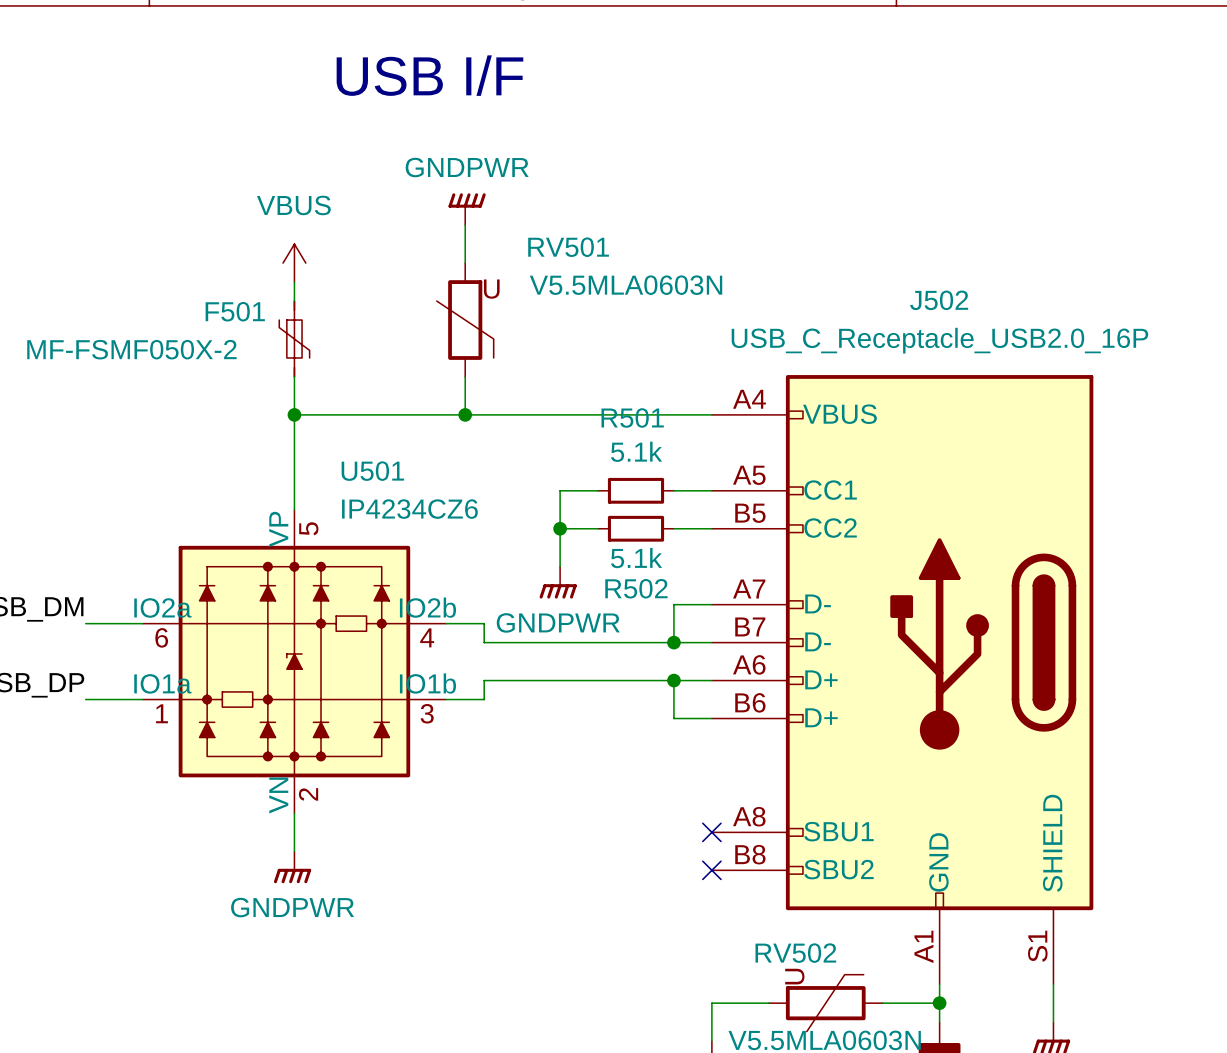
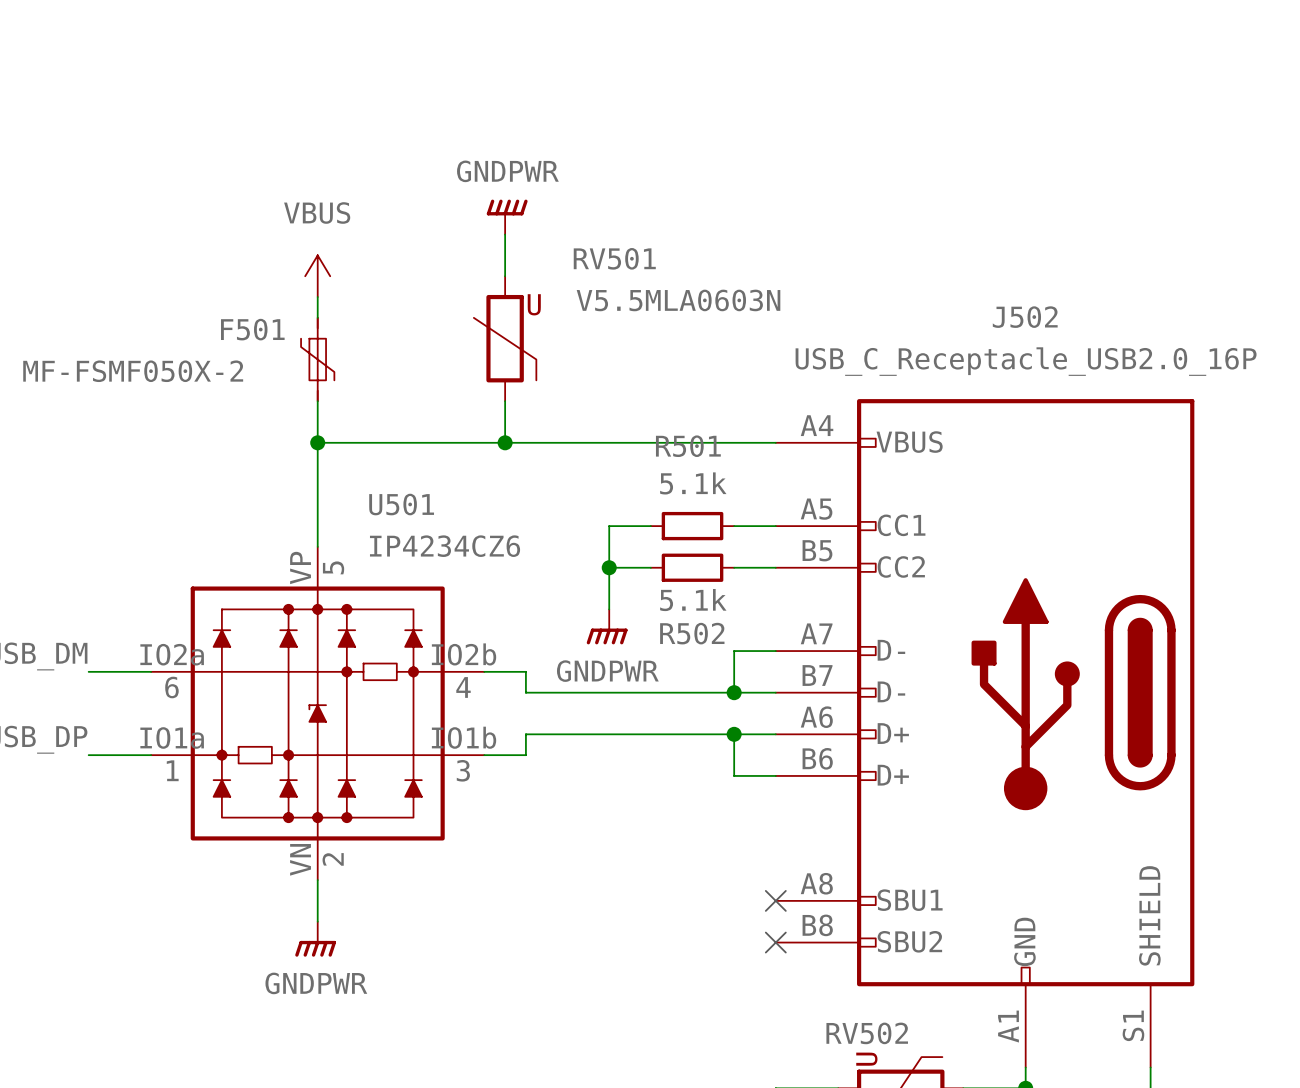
text: USB I/F (429, 75) -> none

